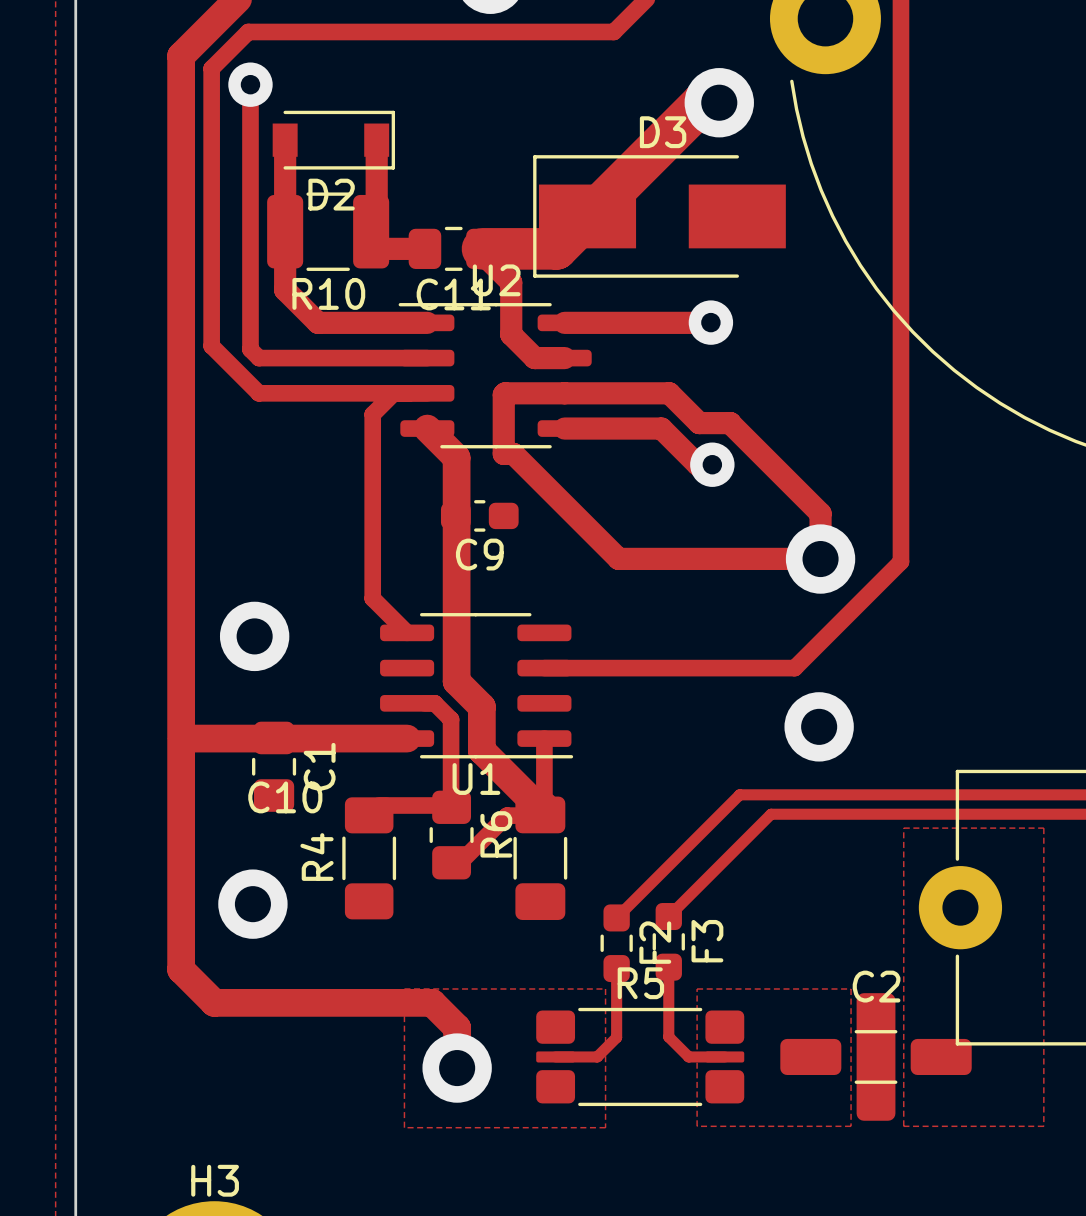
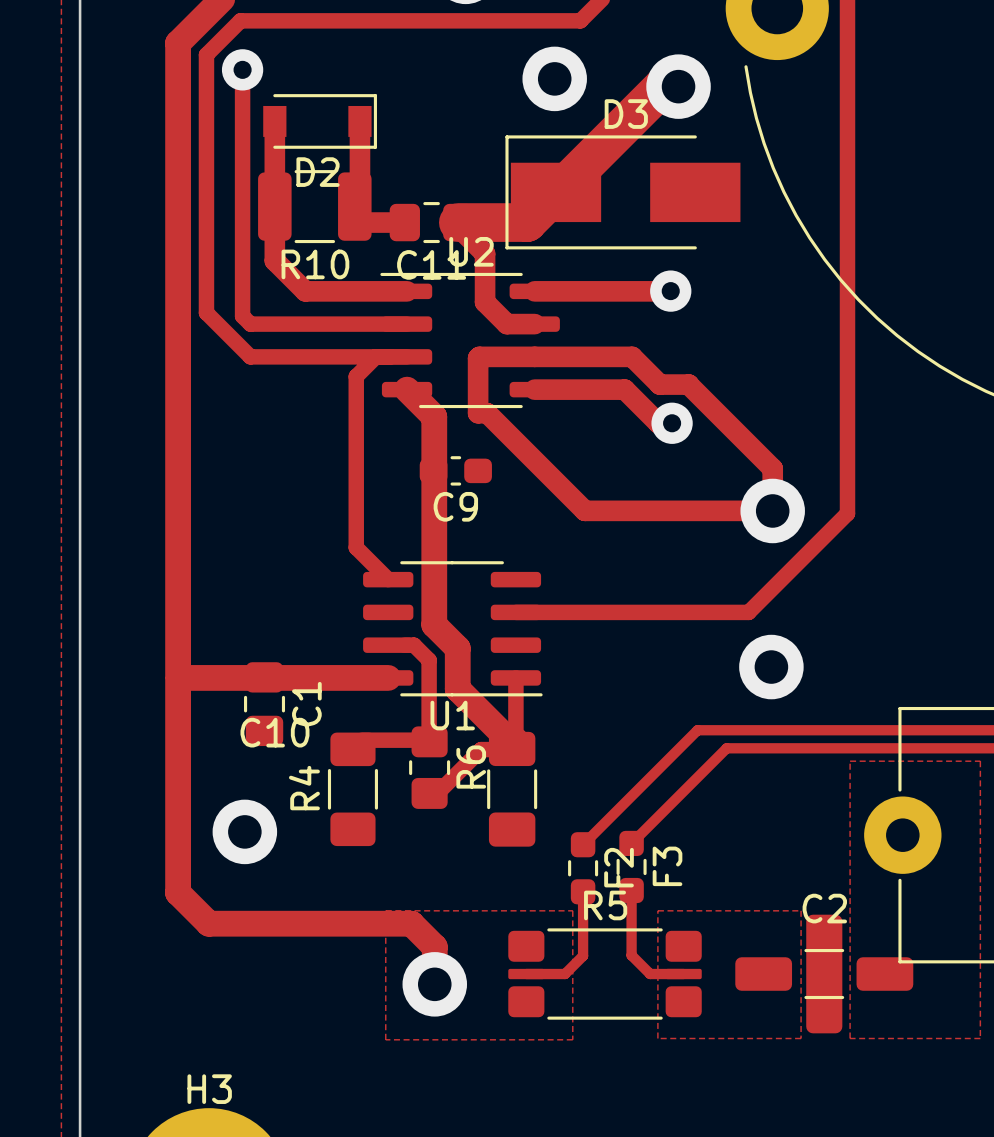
via: none -> (554, 78)
via: (254, 636) -> none

